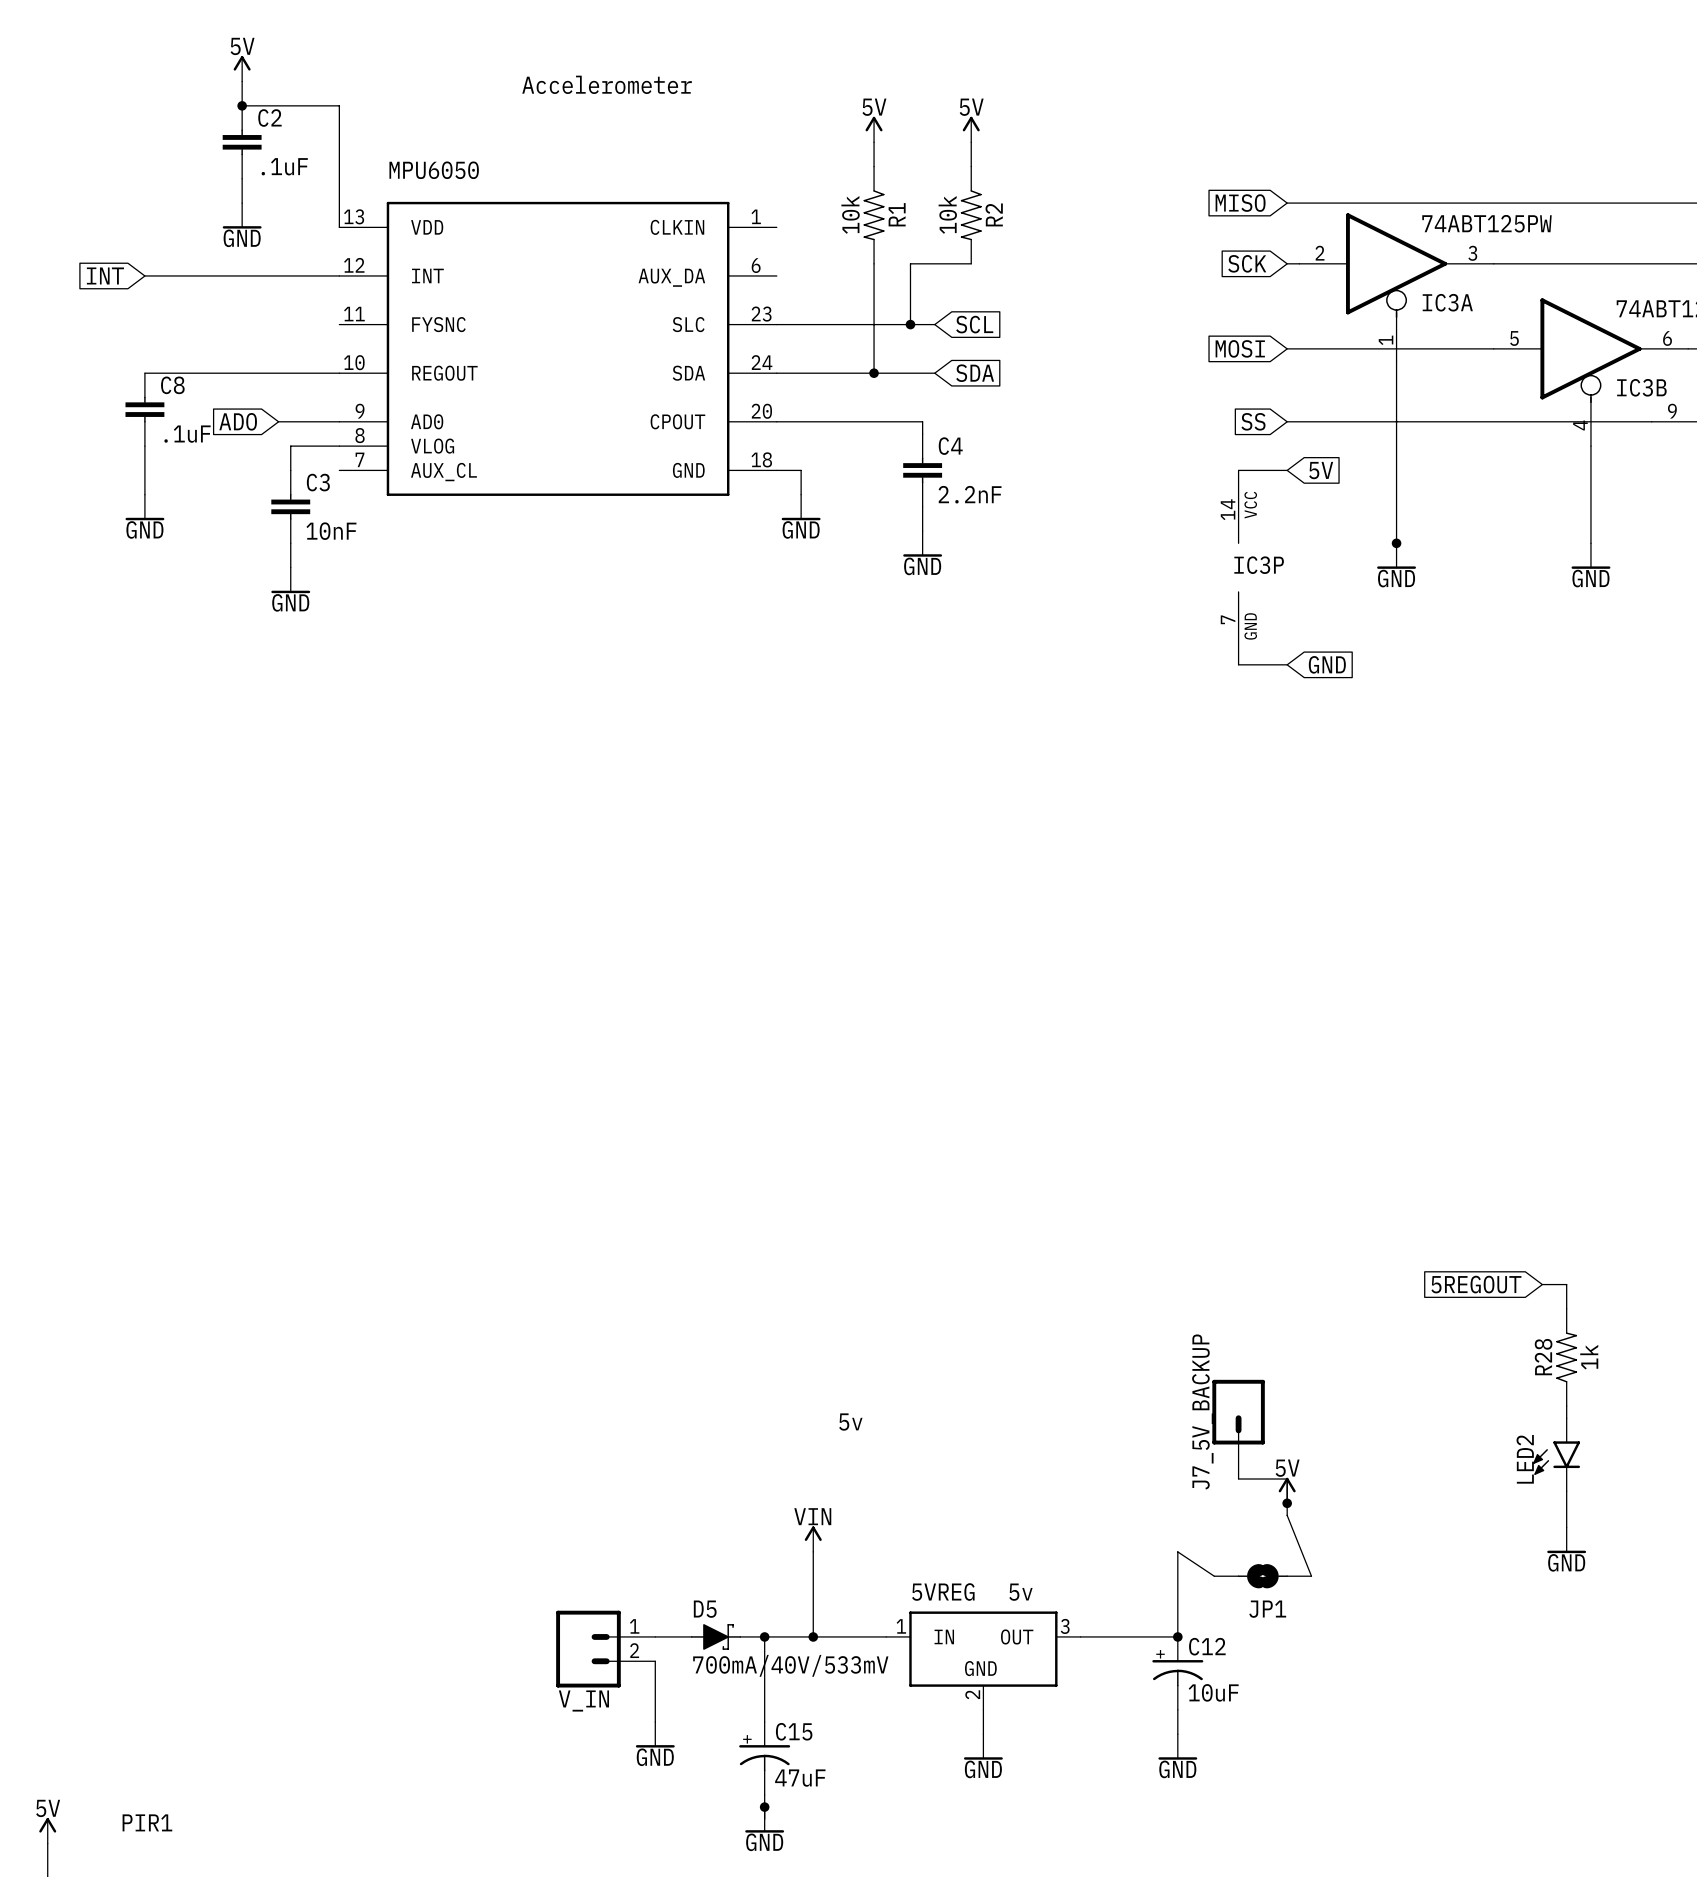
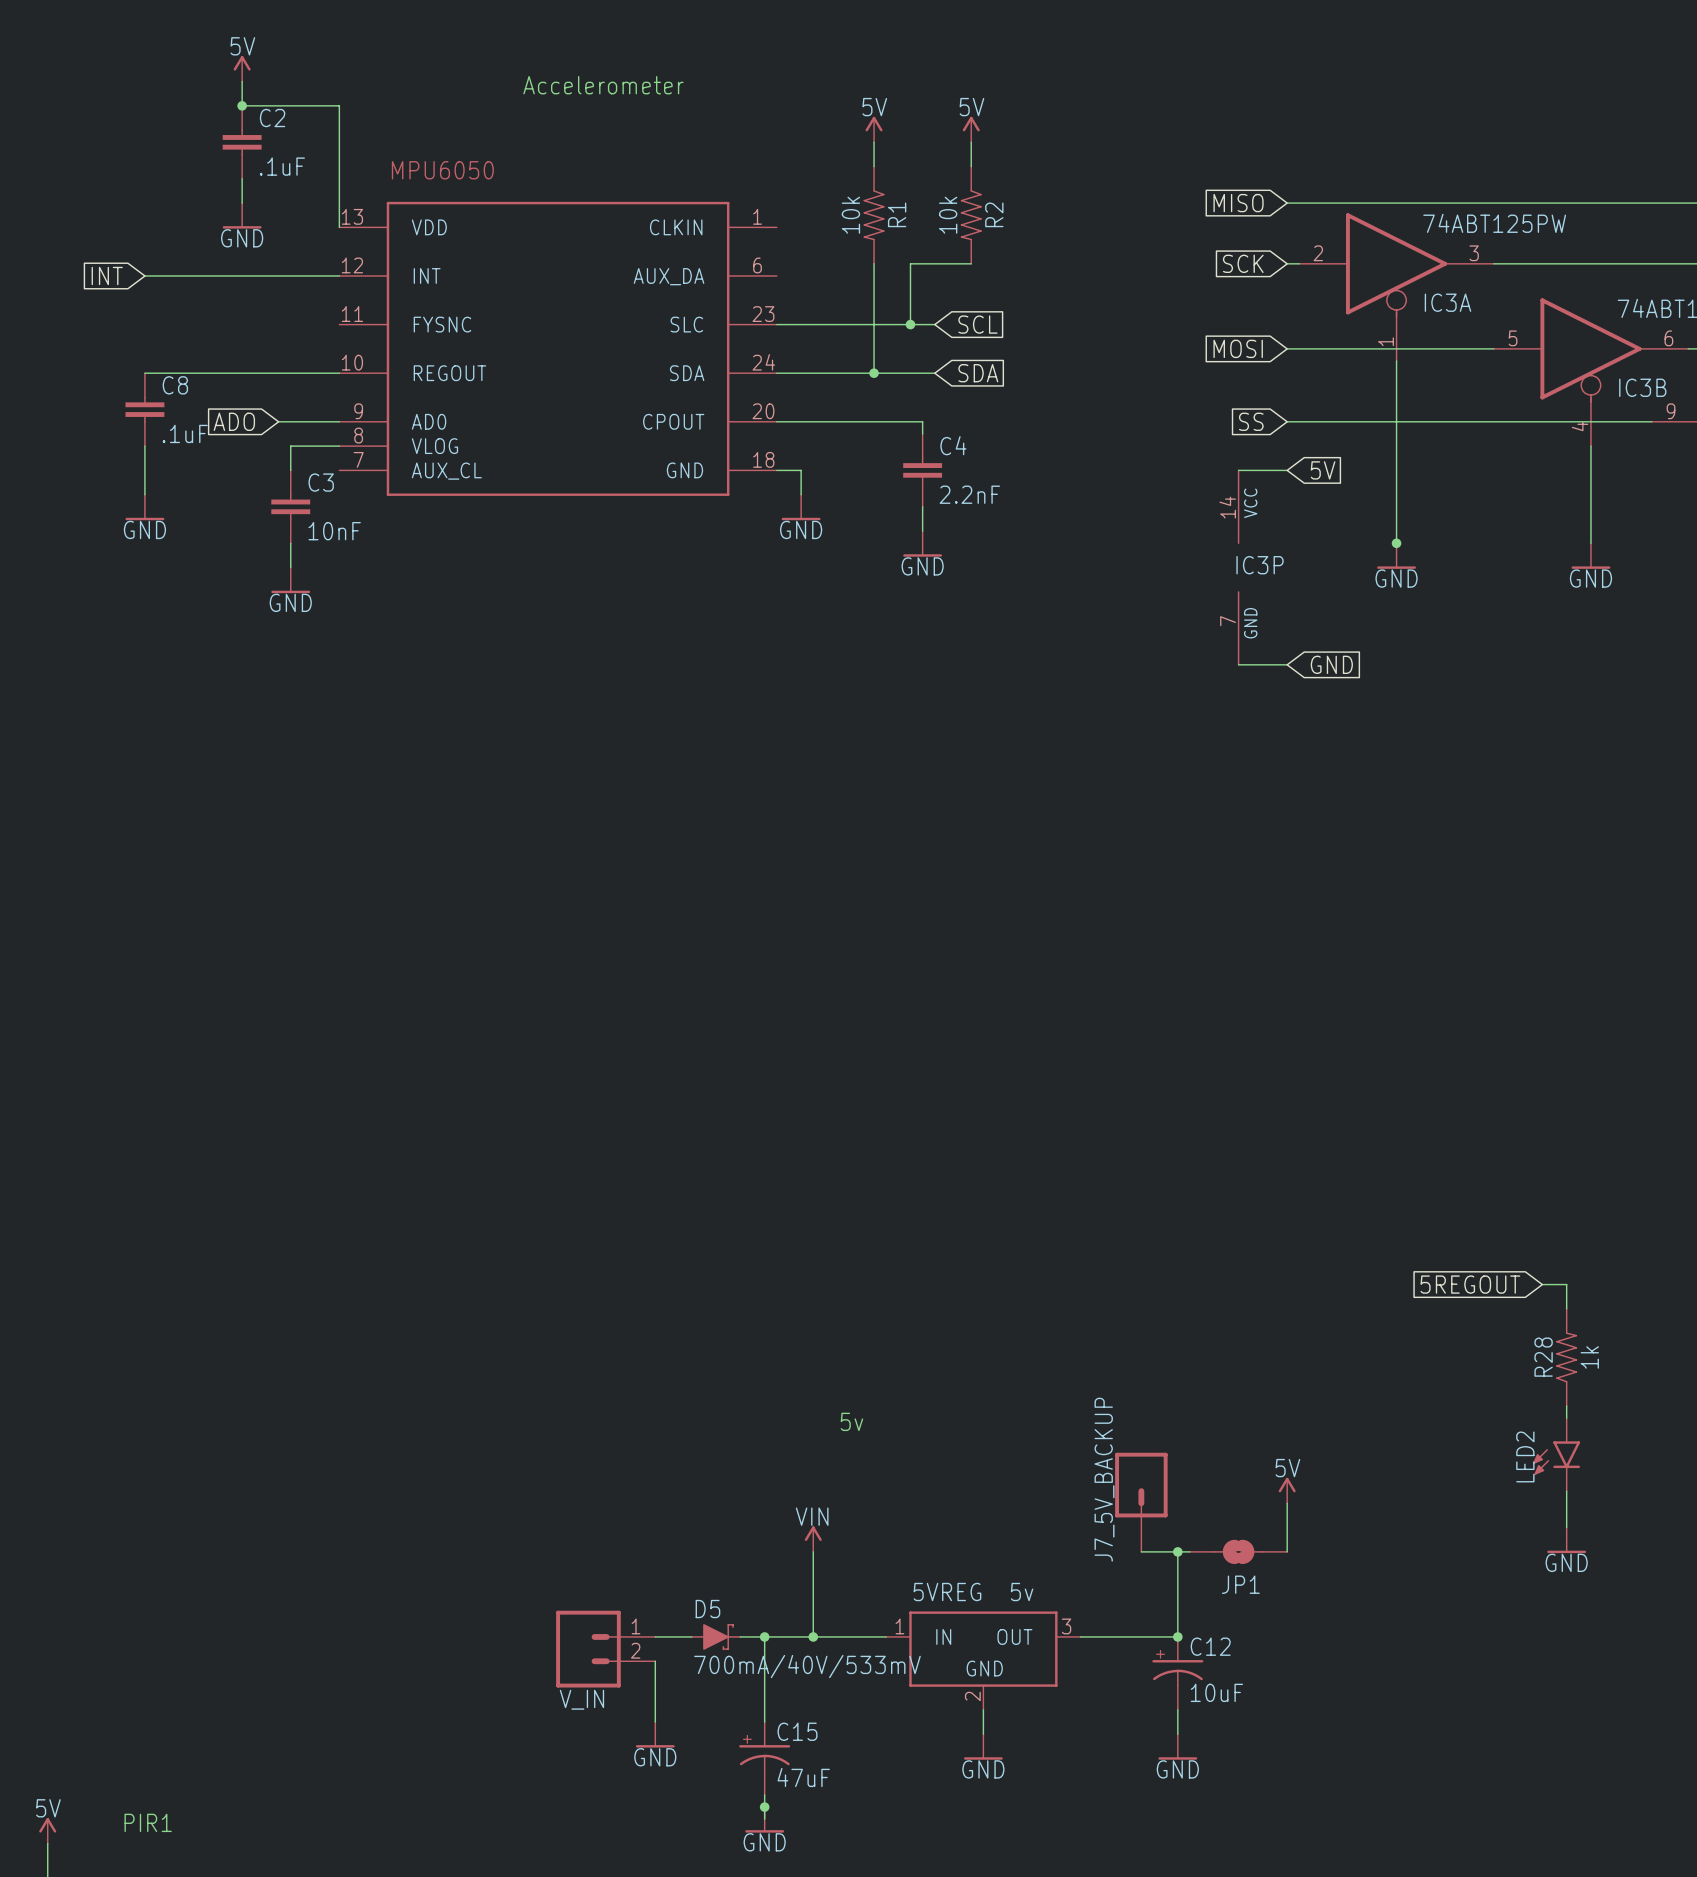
J7_5V_BACKUP position: (1238, 1429) -> (1141, 1502)
wire: (1238, 1478) (1287, 1478) (1287, 1503) -> none
junction: (1287, 1503) -> none
wire: (1287, 1515) (1311, 1576) -> (1287, 1515) (1287, 1551)
wire: none -> (1141, 1551) (1189, 1551)
wire: (1177, 1551) (1214, 1576) -> none
junction: none -> (1177, 1551)
JP1 position: (1262, 1576) -> (1238, 1551)

